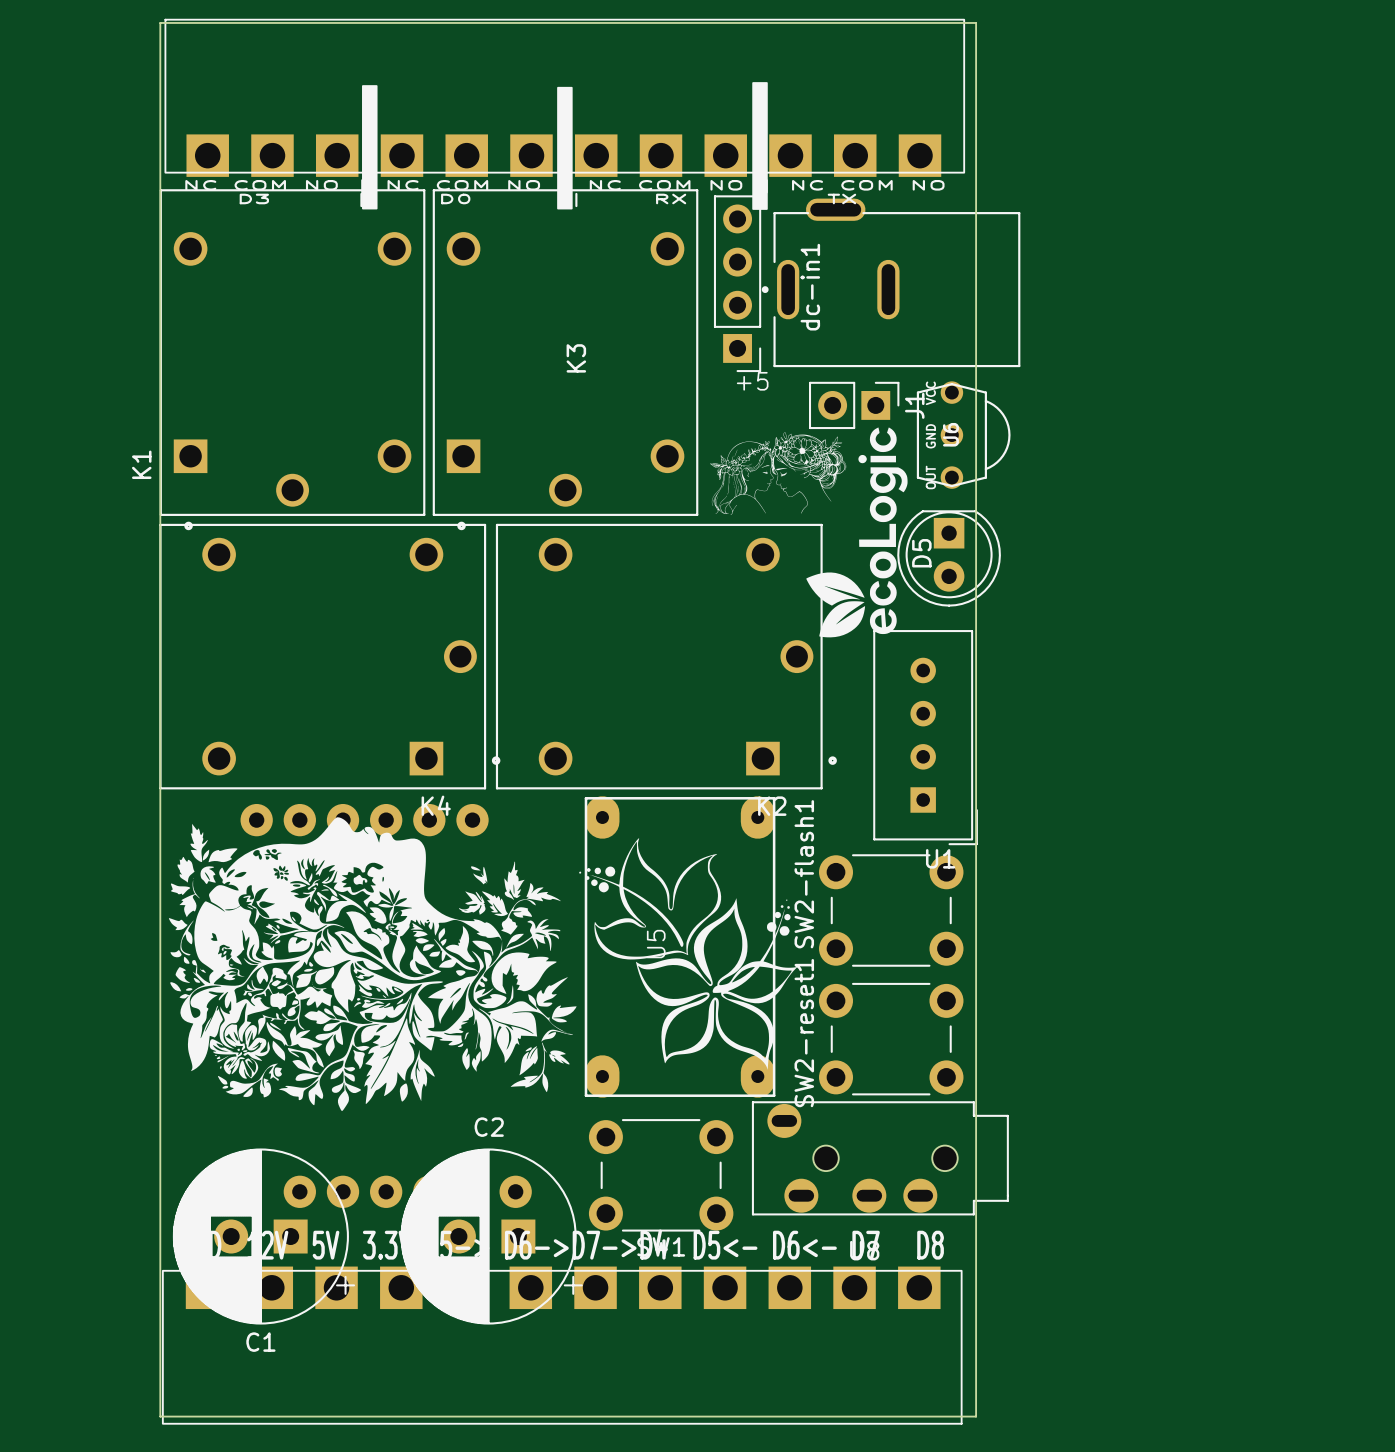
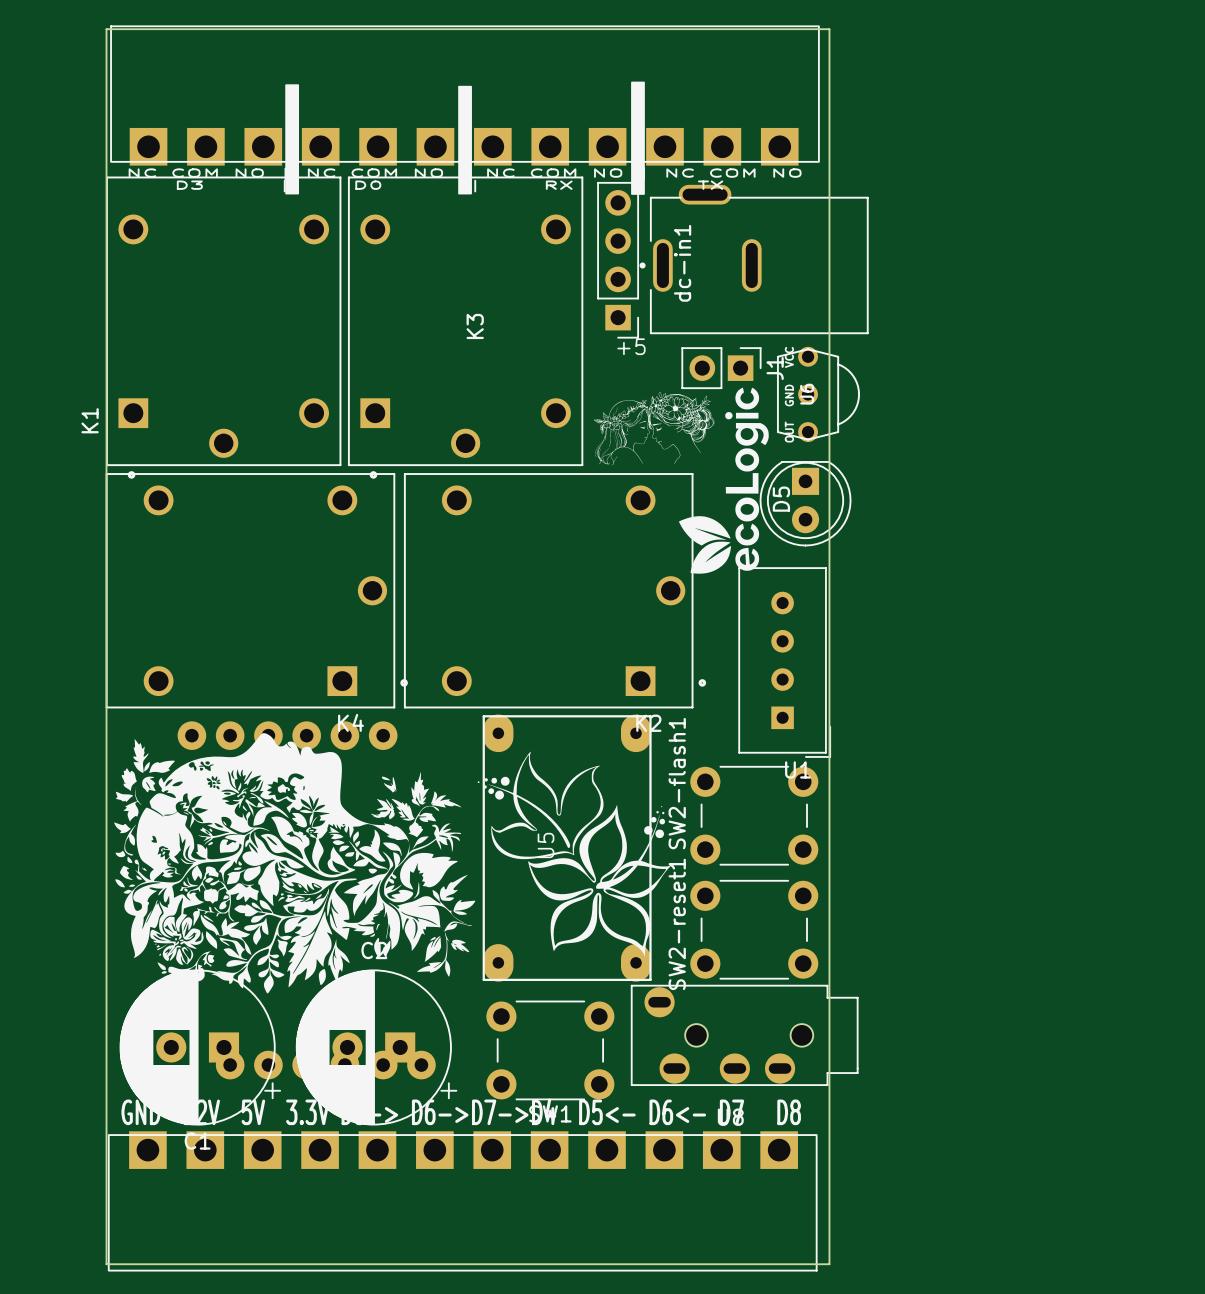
C1 position: (263, 1236) -> (200, 1047)
C2 position: (491, 1236) -> (376, 1047)

